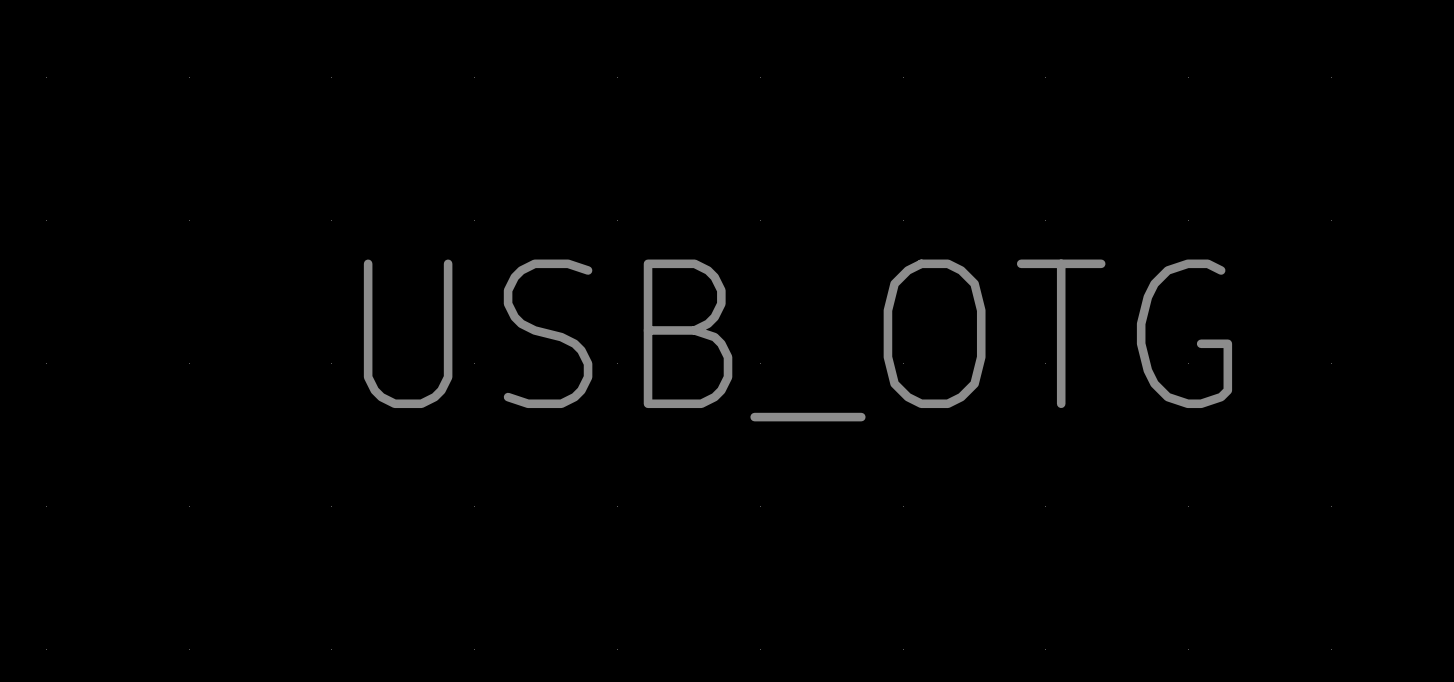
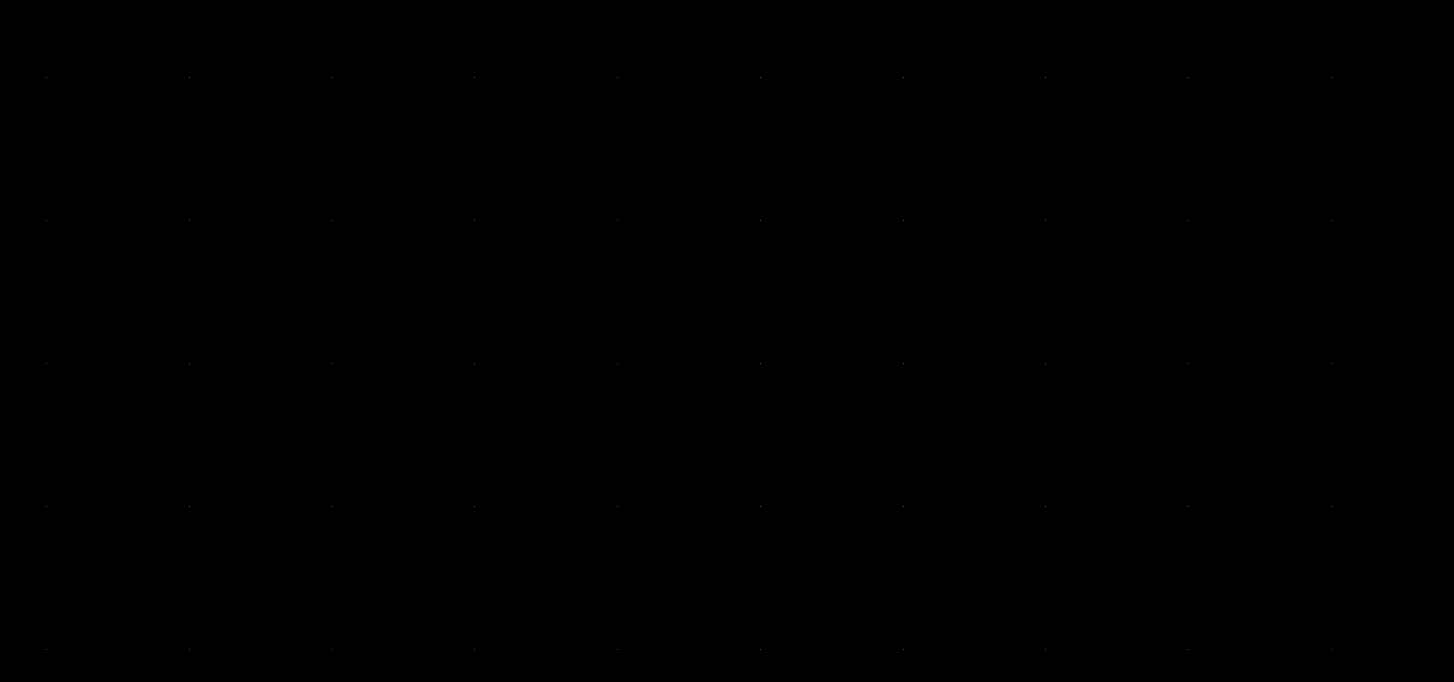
text: USB_OTG (797, 340) -> none

